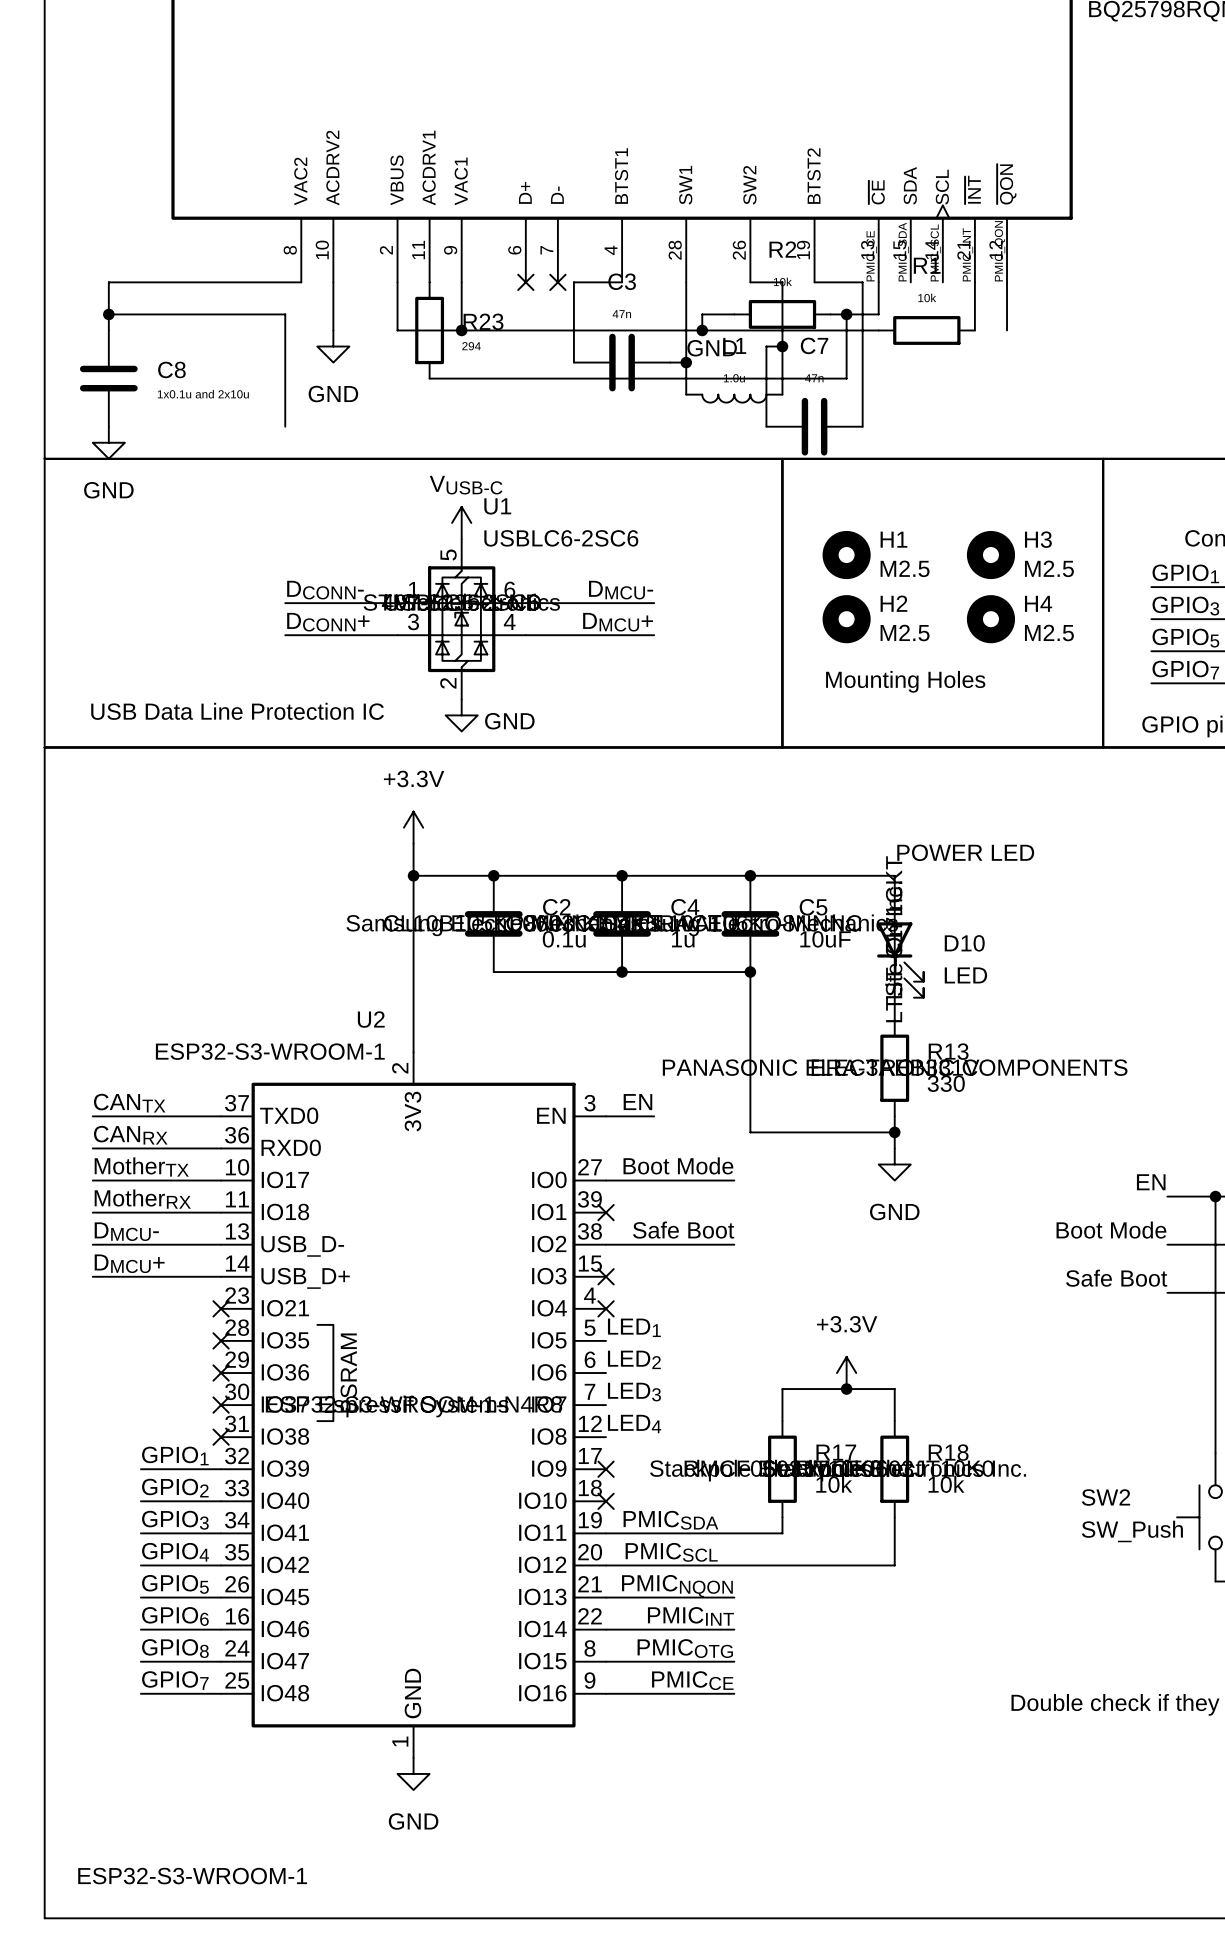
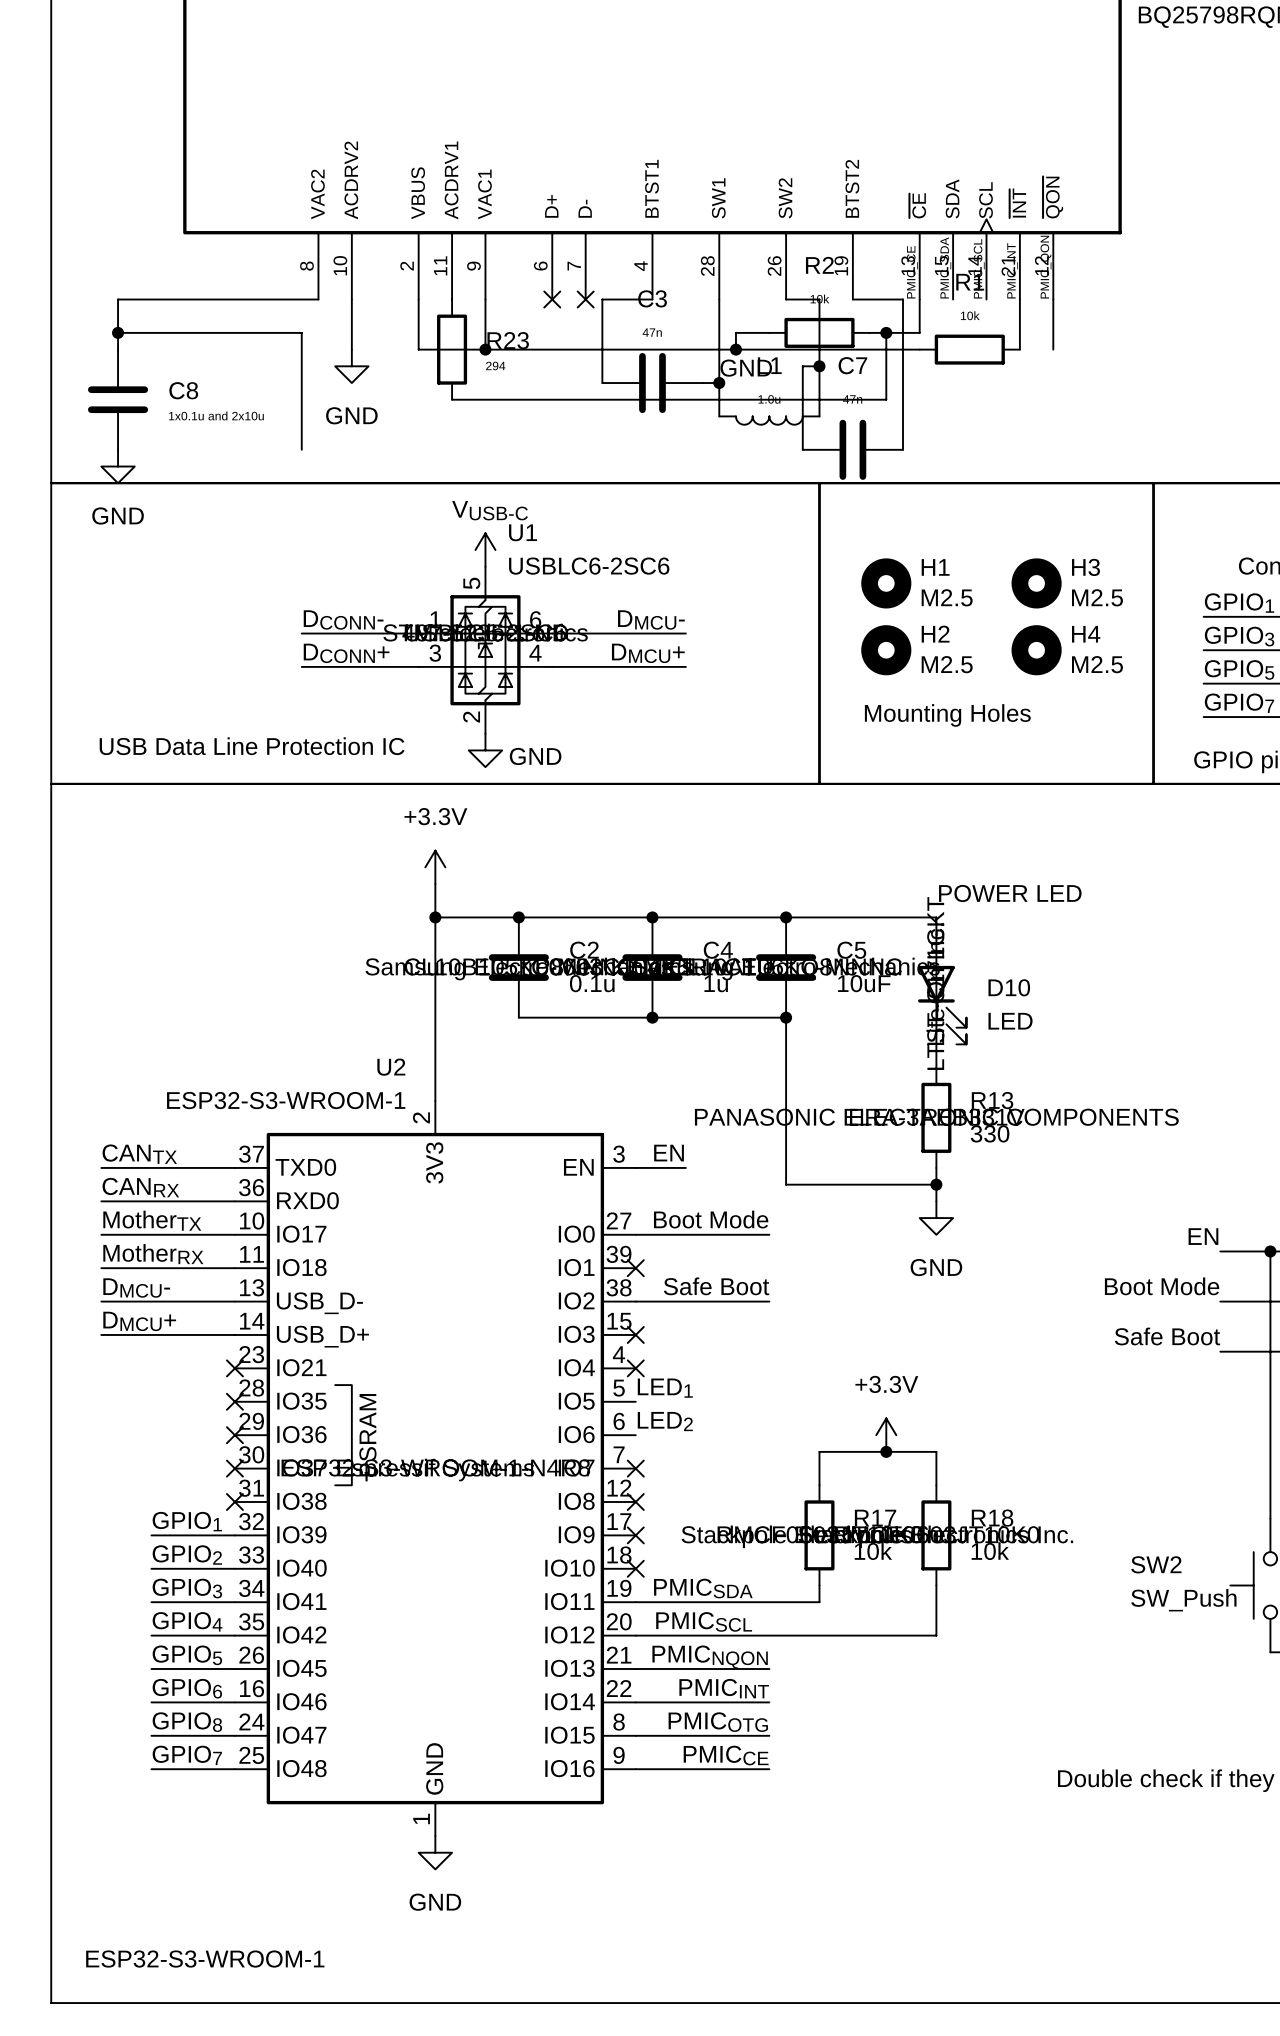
label: LED3 (634, 1392) -> none
no-connect mark: none -> (635, 1468)
label: LED4 (634, 1424) -> none
no-connect mark: none -> (635, 1501)

